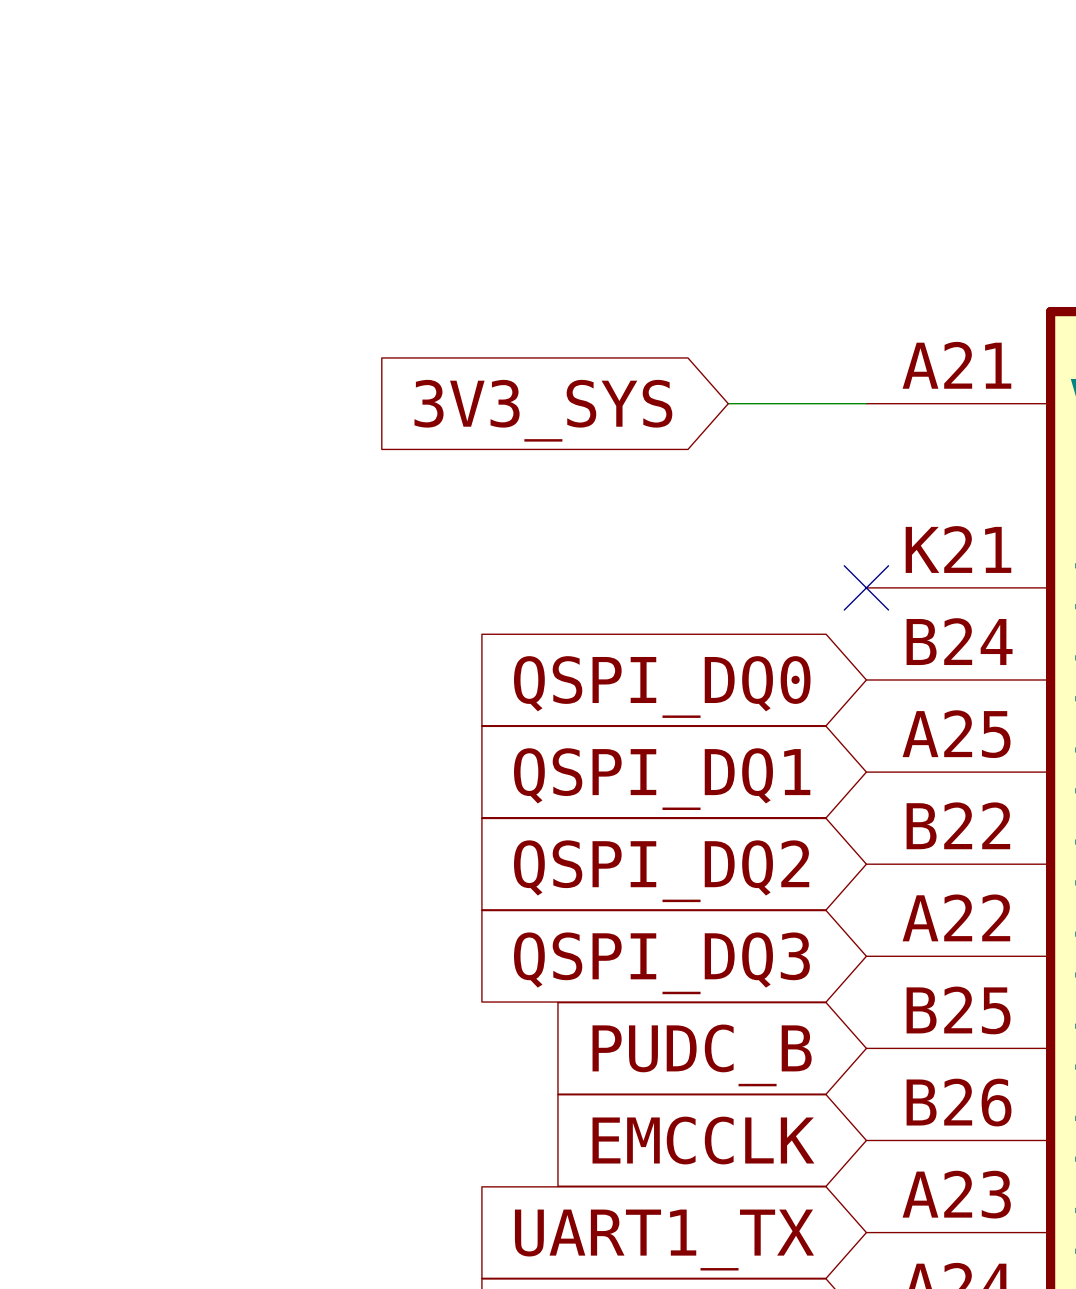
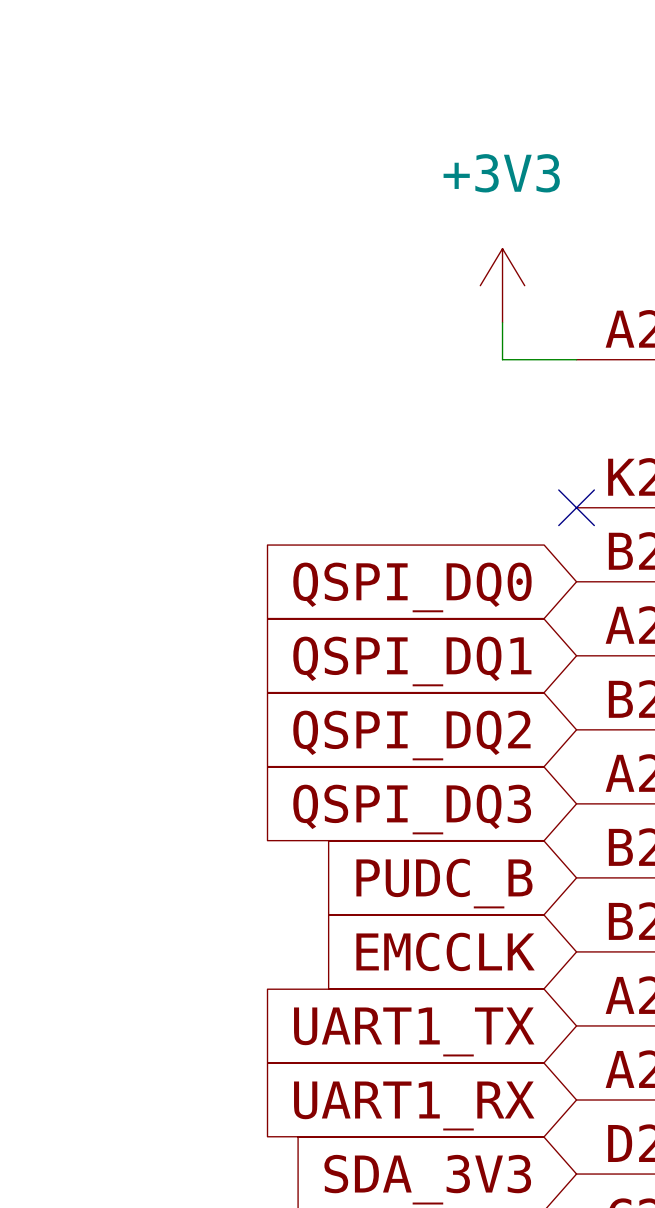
power symbol: none -> +3V3 (502, 285)
wire: (728, 403) (774, 403) -> (502, 322) (502, 359)
global label: 3V3_SYS (543, 410) -> none

